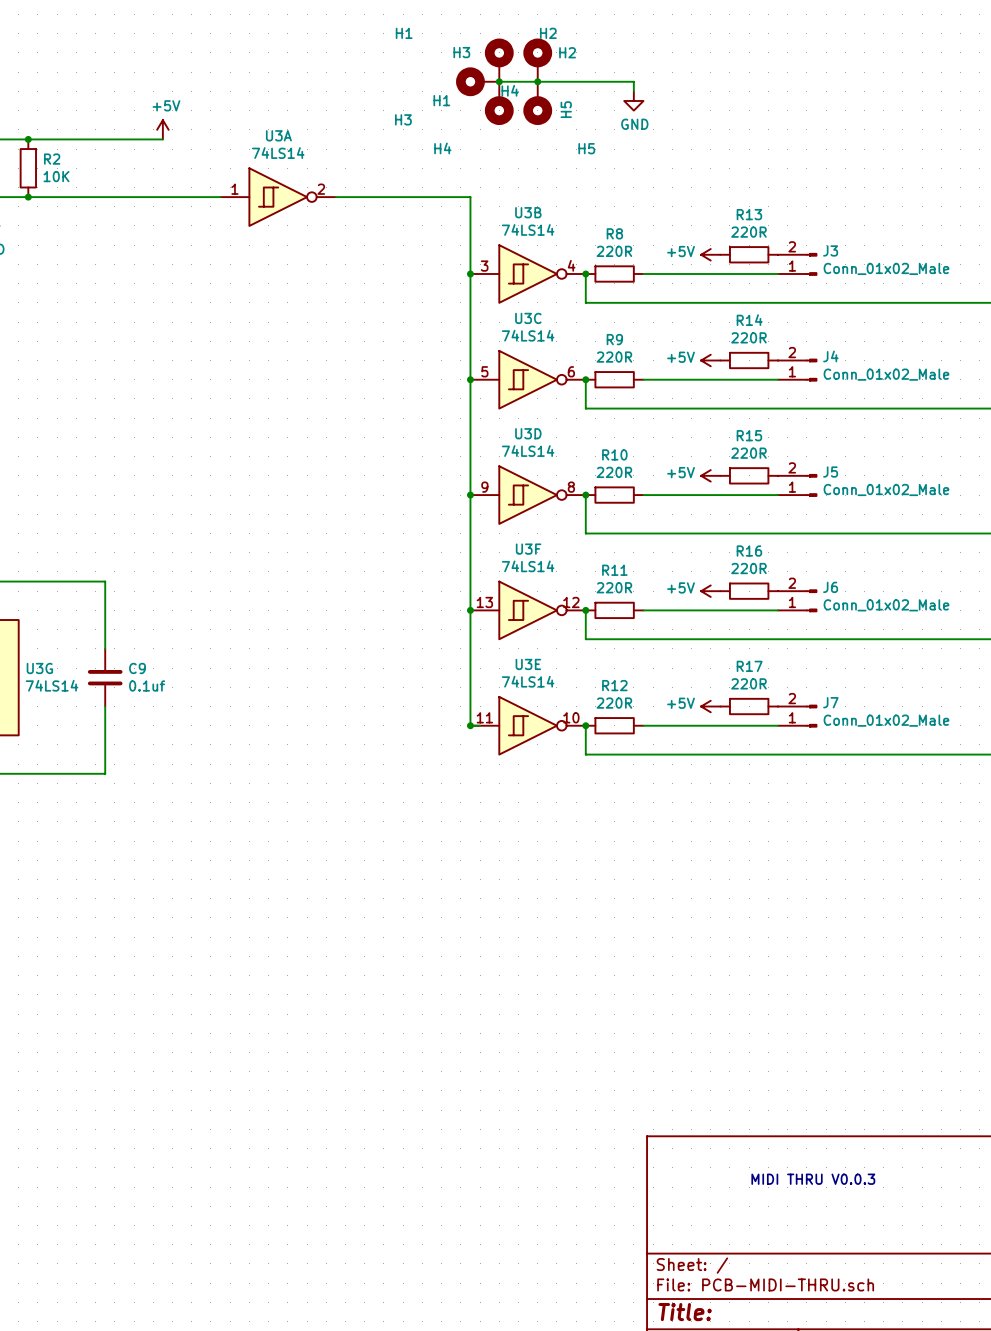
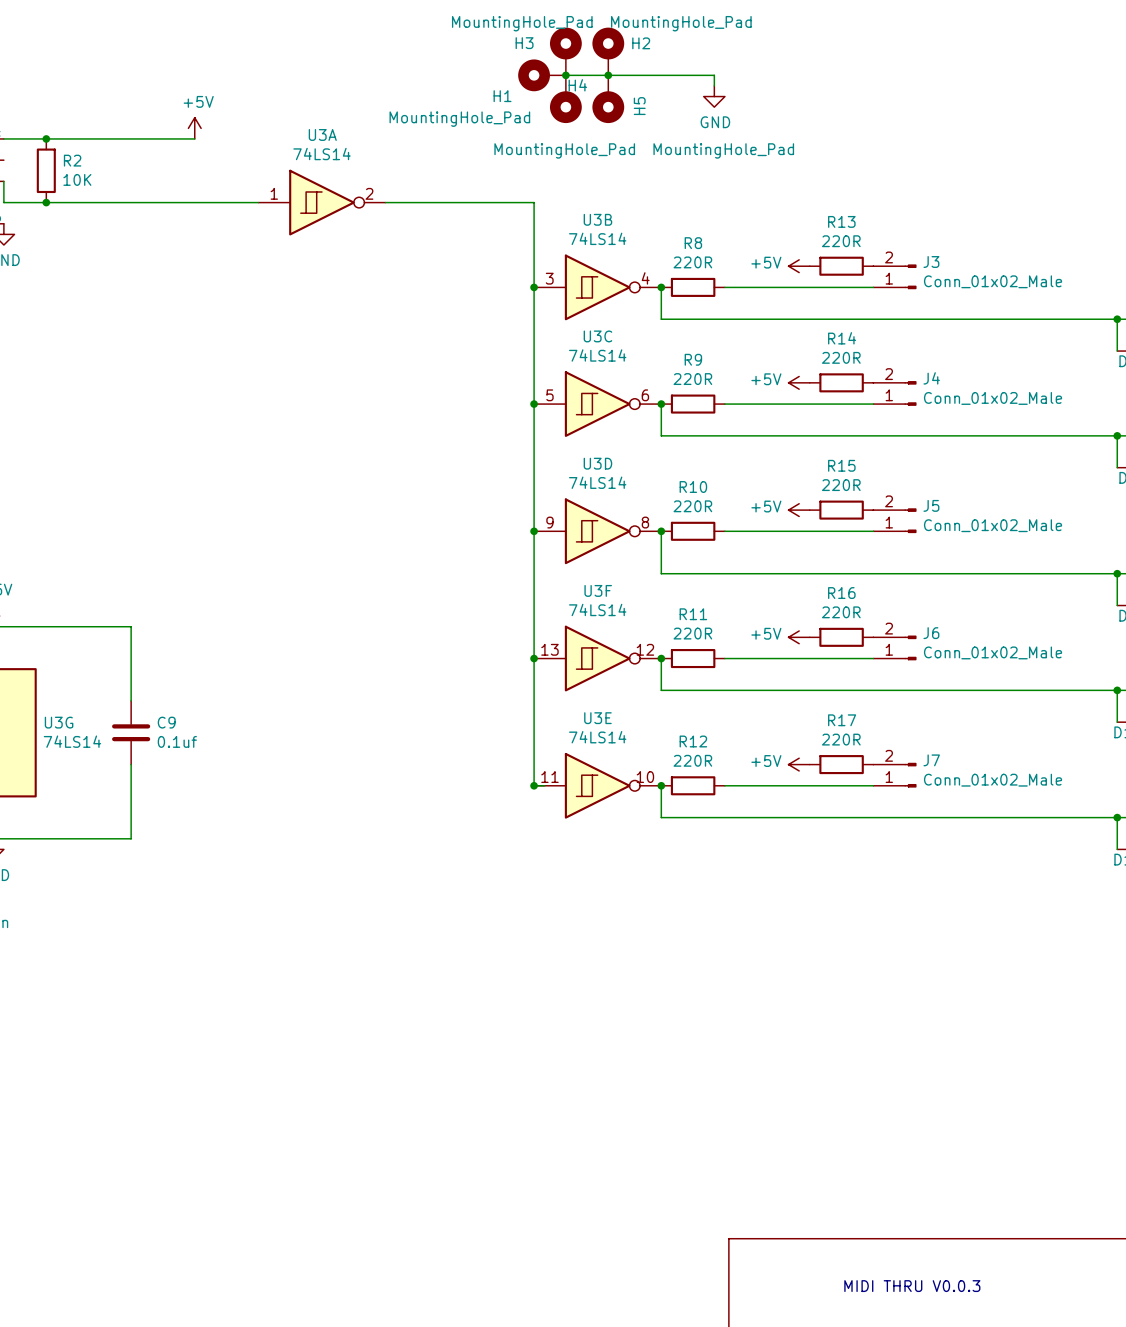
H3 value: H1 (404, 33) -> MountingHole_Pad (522, 23)
H2 value: H2 (548, 33) -> MountingHole_Pad (681, 23)
H1 value: H3 (403, 119) -> MountingHole_Pad (459, 119)
H4 value: H4 (442, 148) -> MountingHole_Pad (564, 150)
H5 value: H5 (586, 148) -> MountingHole_Pad (723, 150)

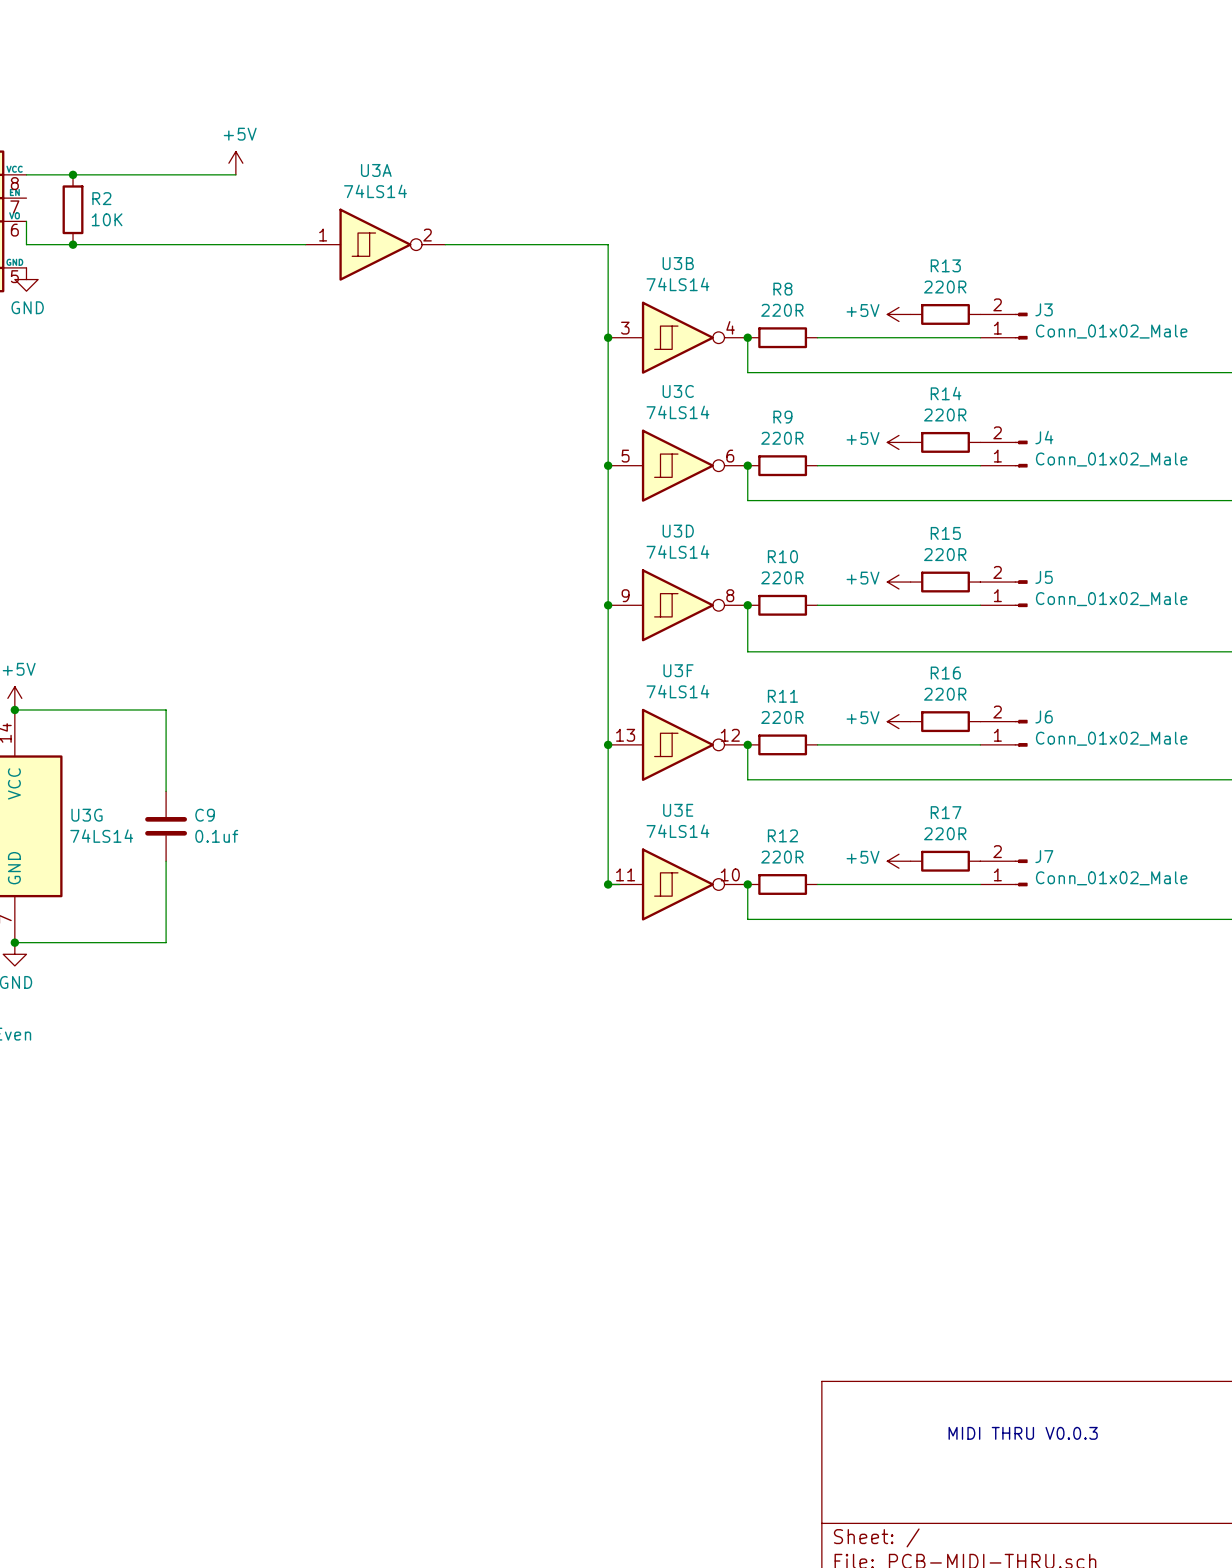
H3: MountingHole_Pad (565, 51) -> none
H2: MountingHole_Pad (608, 51) -> none
H1: MountingHole_Pad (542, 75) -> none
wire: (565, 75) (714, 75) (714, 85) -> none
junction: (565, 75) -> none
junction: (608, 75) -> none
power symbol: GND (714, 96) -> none
H4: MountingHole_Pad (565, 99) -> none
H5: MountingHole_Pad (608, 99) -> none

